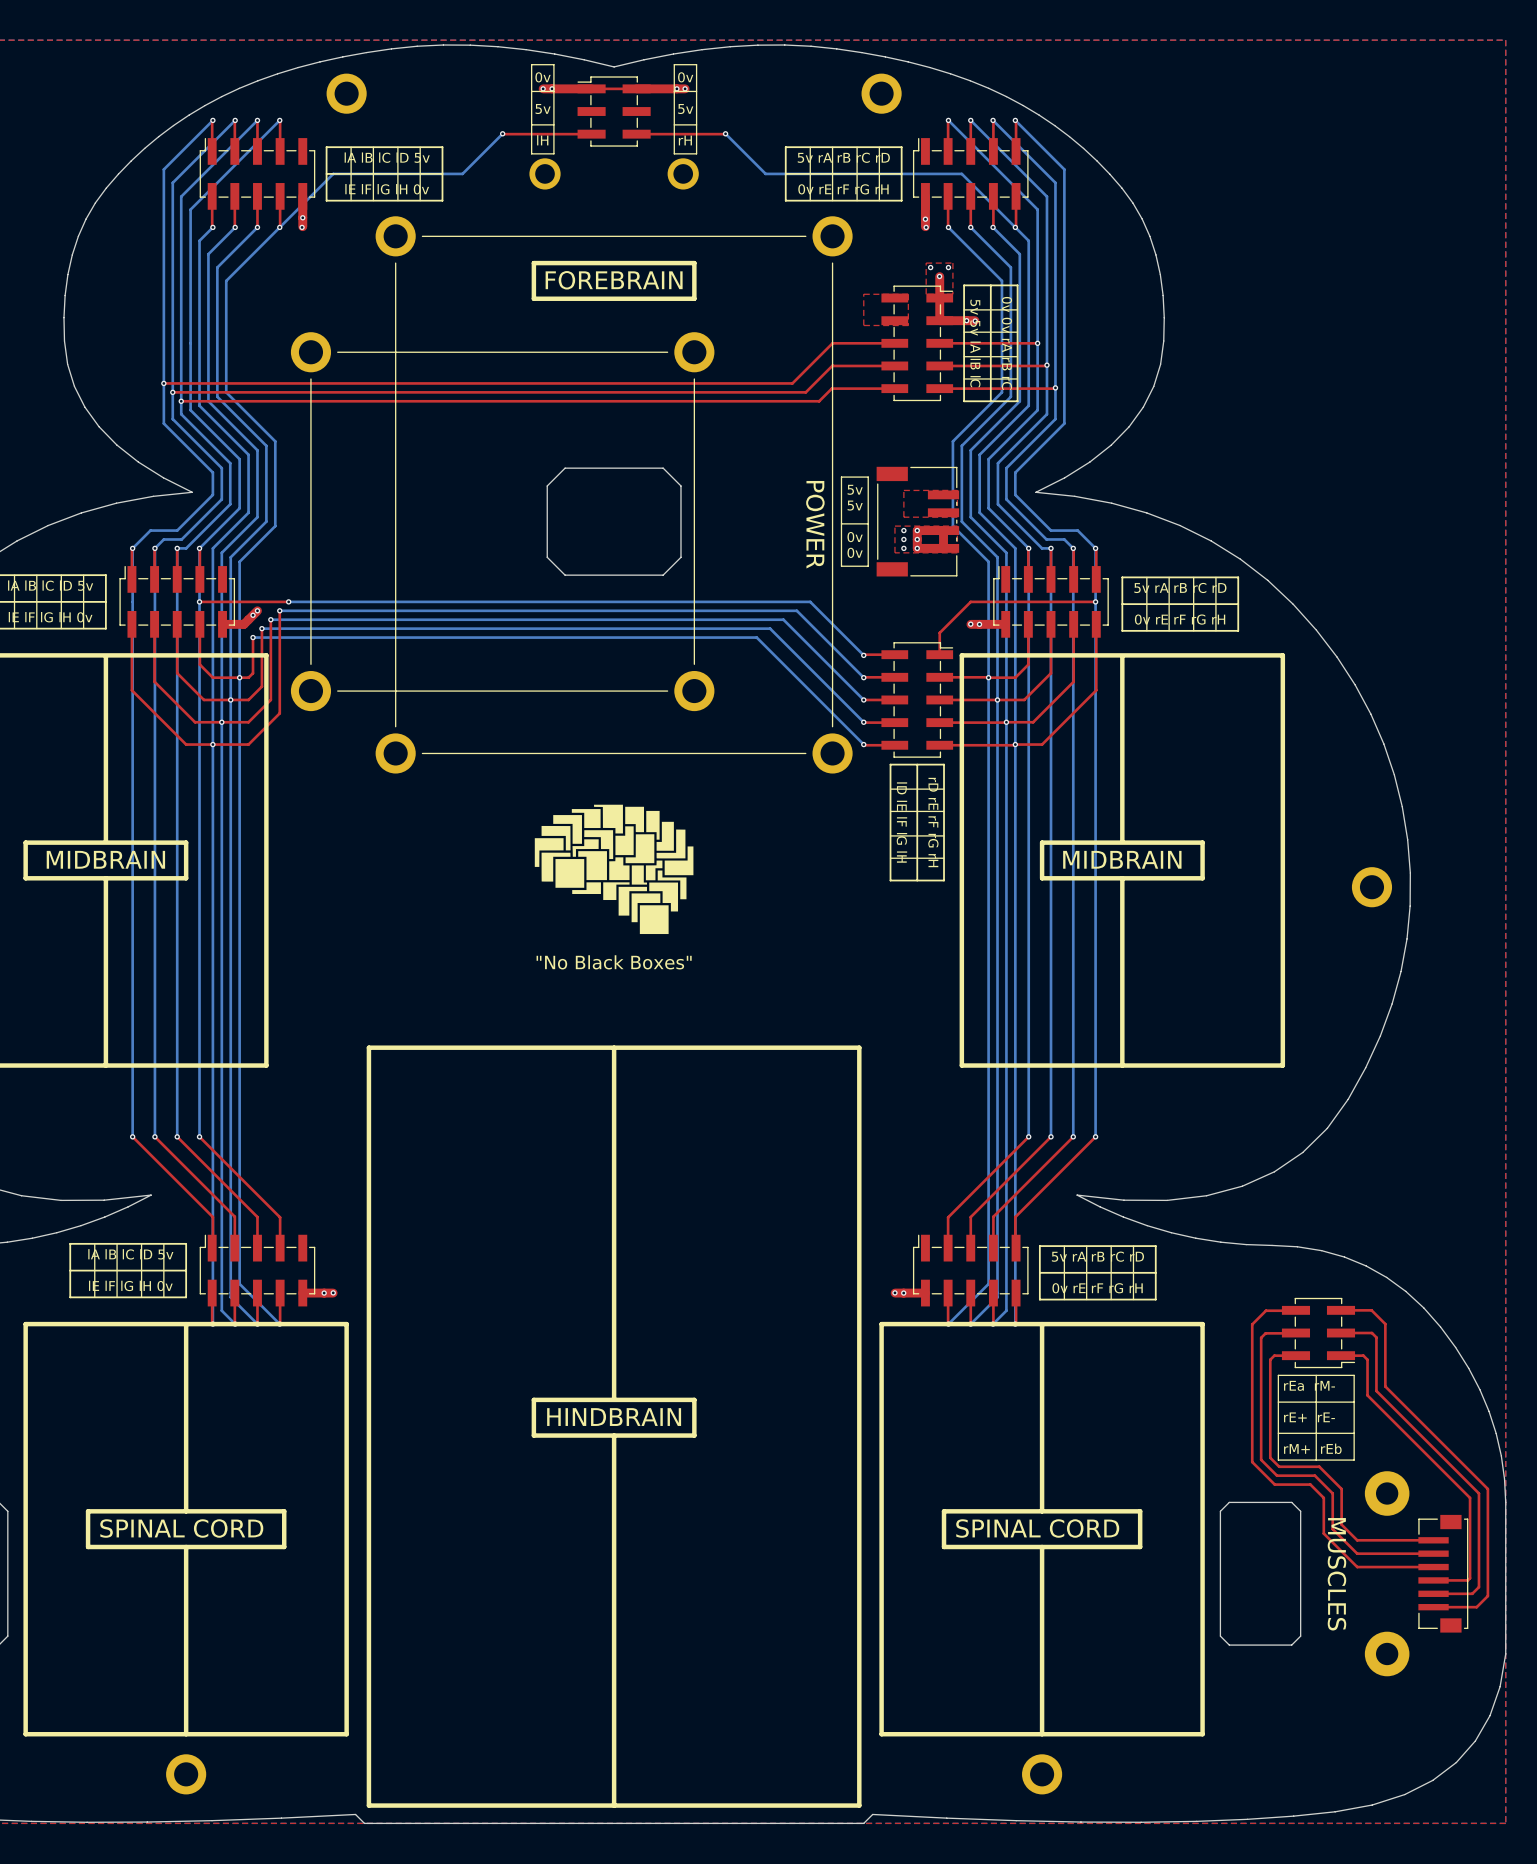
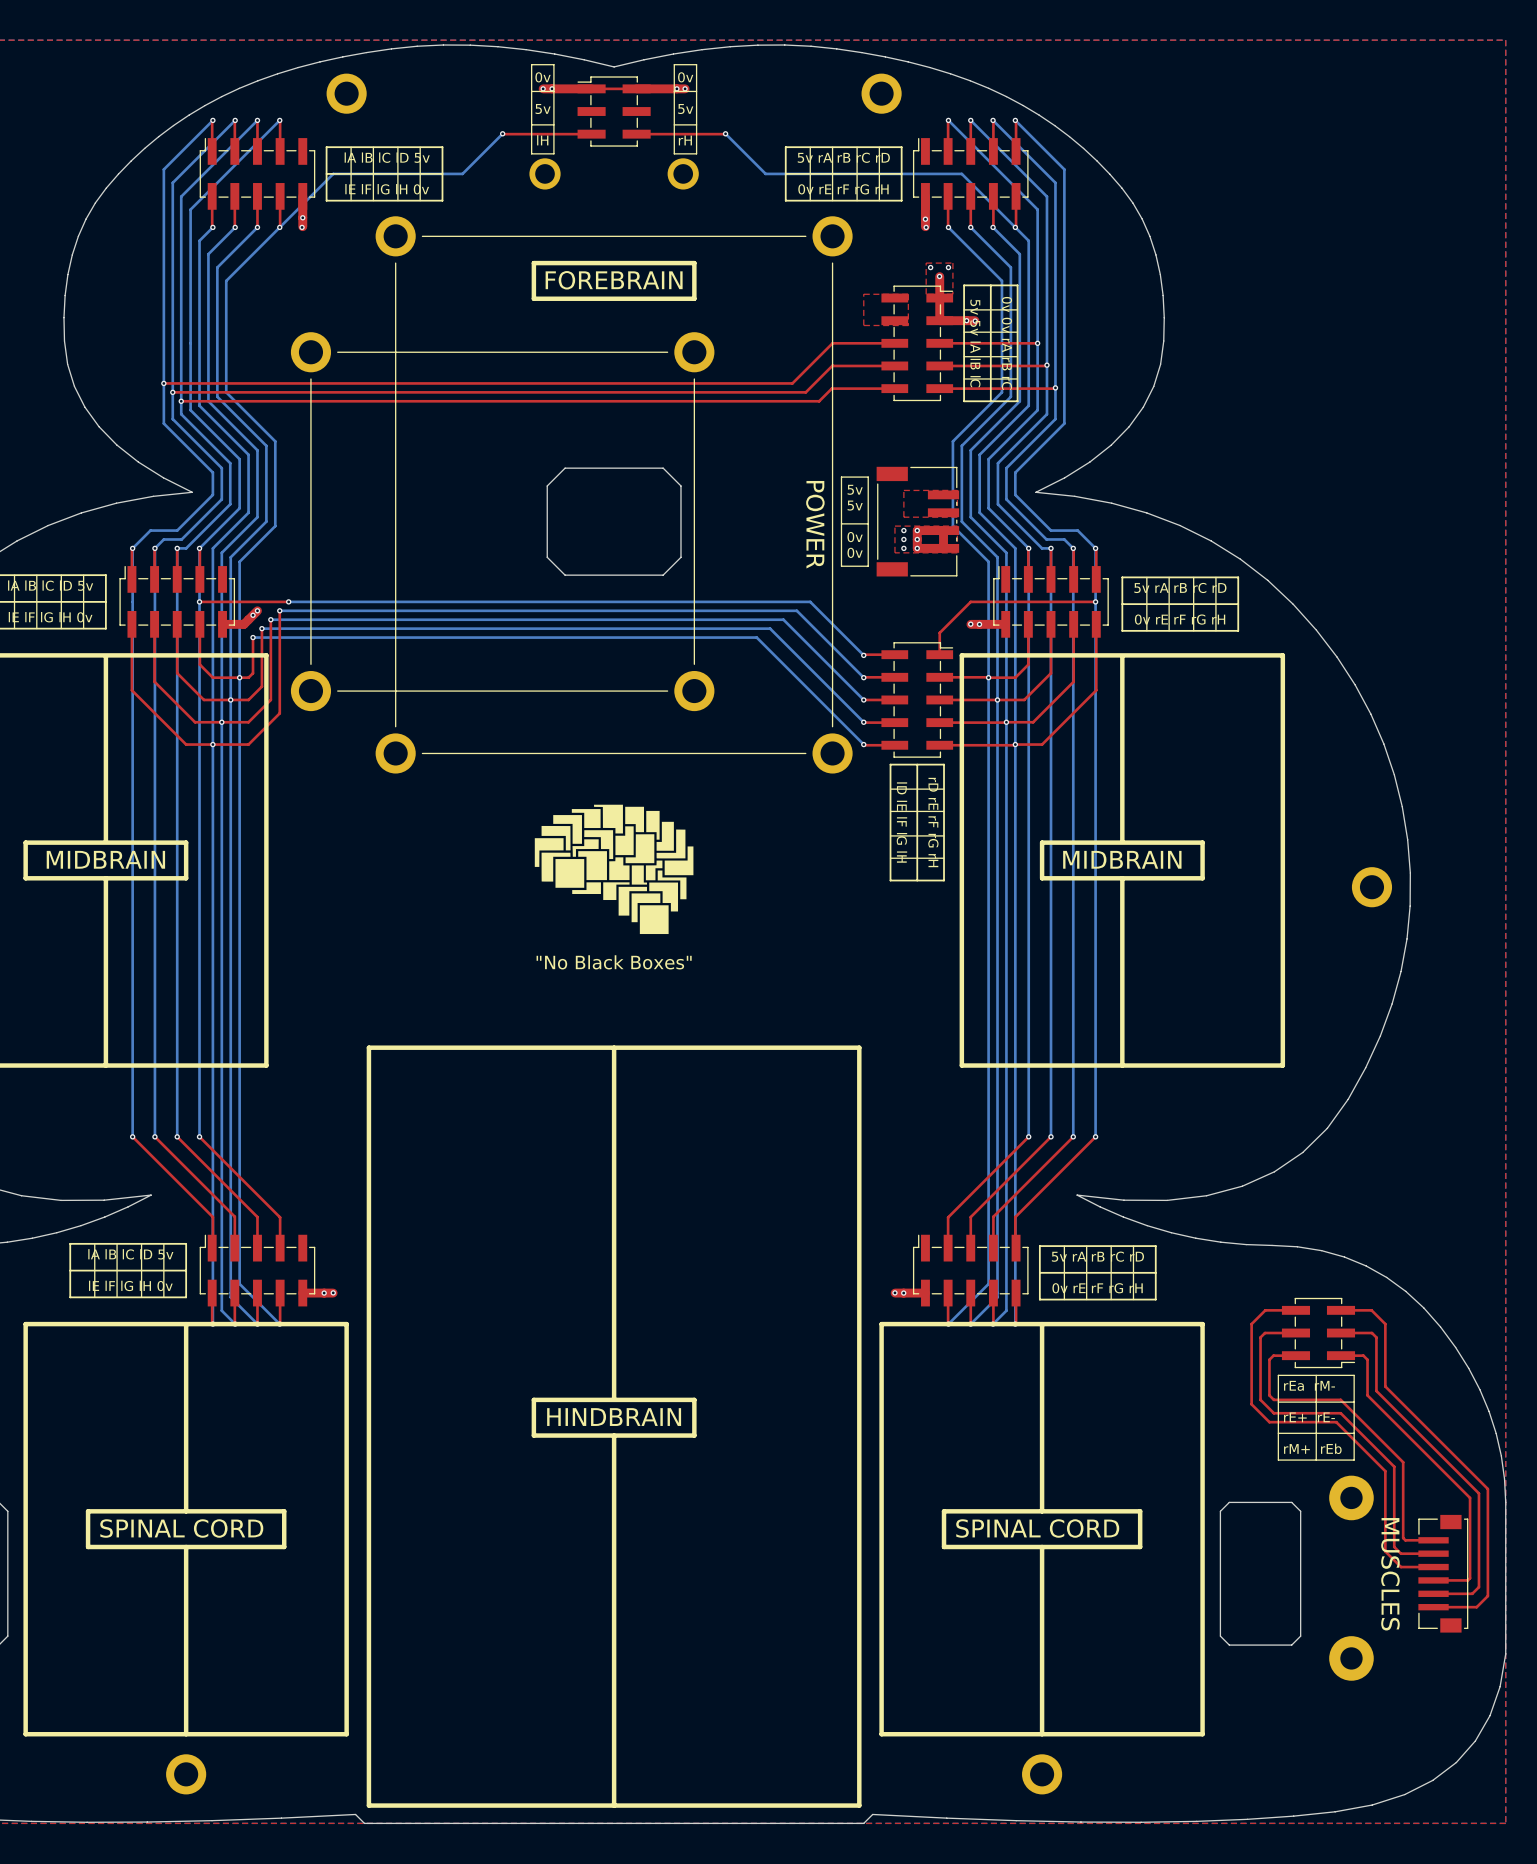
top track: (1296, 1310) (1265, 1310) (1252, 1324) (1252, 1462) (1274, 1484) (1310, 1484) (1323, 1497) (1323, 1533) (1357, 1567) (1400, 1567) -> (1295, 1310) (1265, 1310) (1251, 1324) (1251, 1404) (1269, 1422) (1336, 1422) (1385, 1471) (1385, 1551) (1400, 1567)
top track: (1296, 1333) (1265, 1333) (1261, 1337) (1261, 1459) (1276, 1475) (1314, 1475) (1332, 1493) (1332, 1529) (1357, 1553) (1400, 1553) -> (1295, 1333) (1264, 1333) (1260, 1337) (1260, 1399) (1273, 1413) (1340, 1413) (1394, 1466) (1394, 1546) (1400, 1553)
top track: (1274, 1355) (1270, 1359) (1270, 1457) (1279, 1466) (1319, 1466) (1341, 1489) (1341, 1524) (1357, 1540) (1405, 1540) -> (1274, 1355) (1269, 1359) (1269, 1395) (1273, 1399) (1340, 1399) (1403, 1462) (1403, 1538) (1405, 1540)
part position: (1387, 1493) -> (1351, 1497)
text position: MUSCLES (1336, 1574) -> MUSCLES (1390, 1574)
part position: (1387, 1653) -> (1351, 1658)

